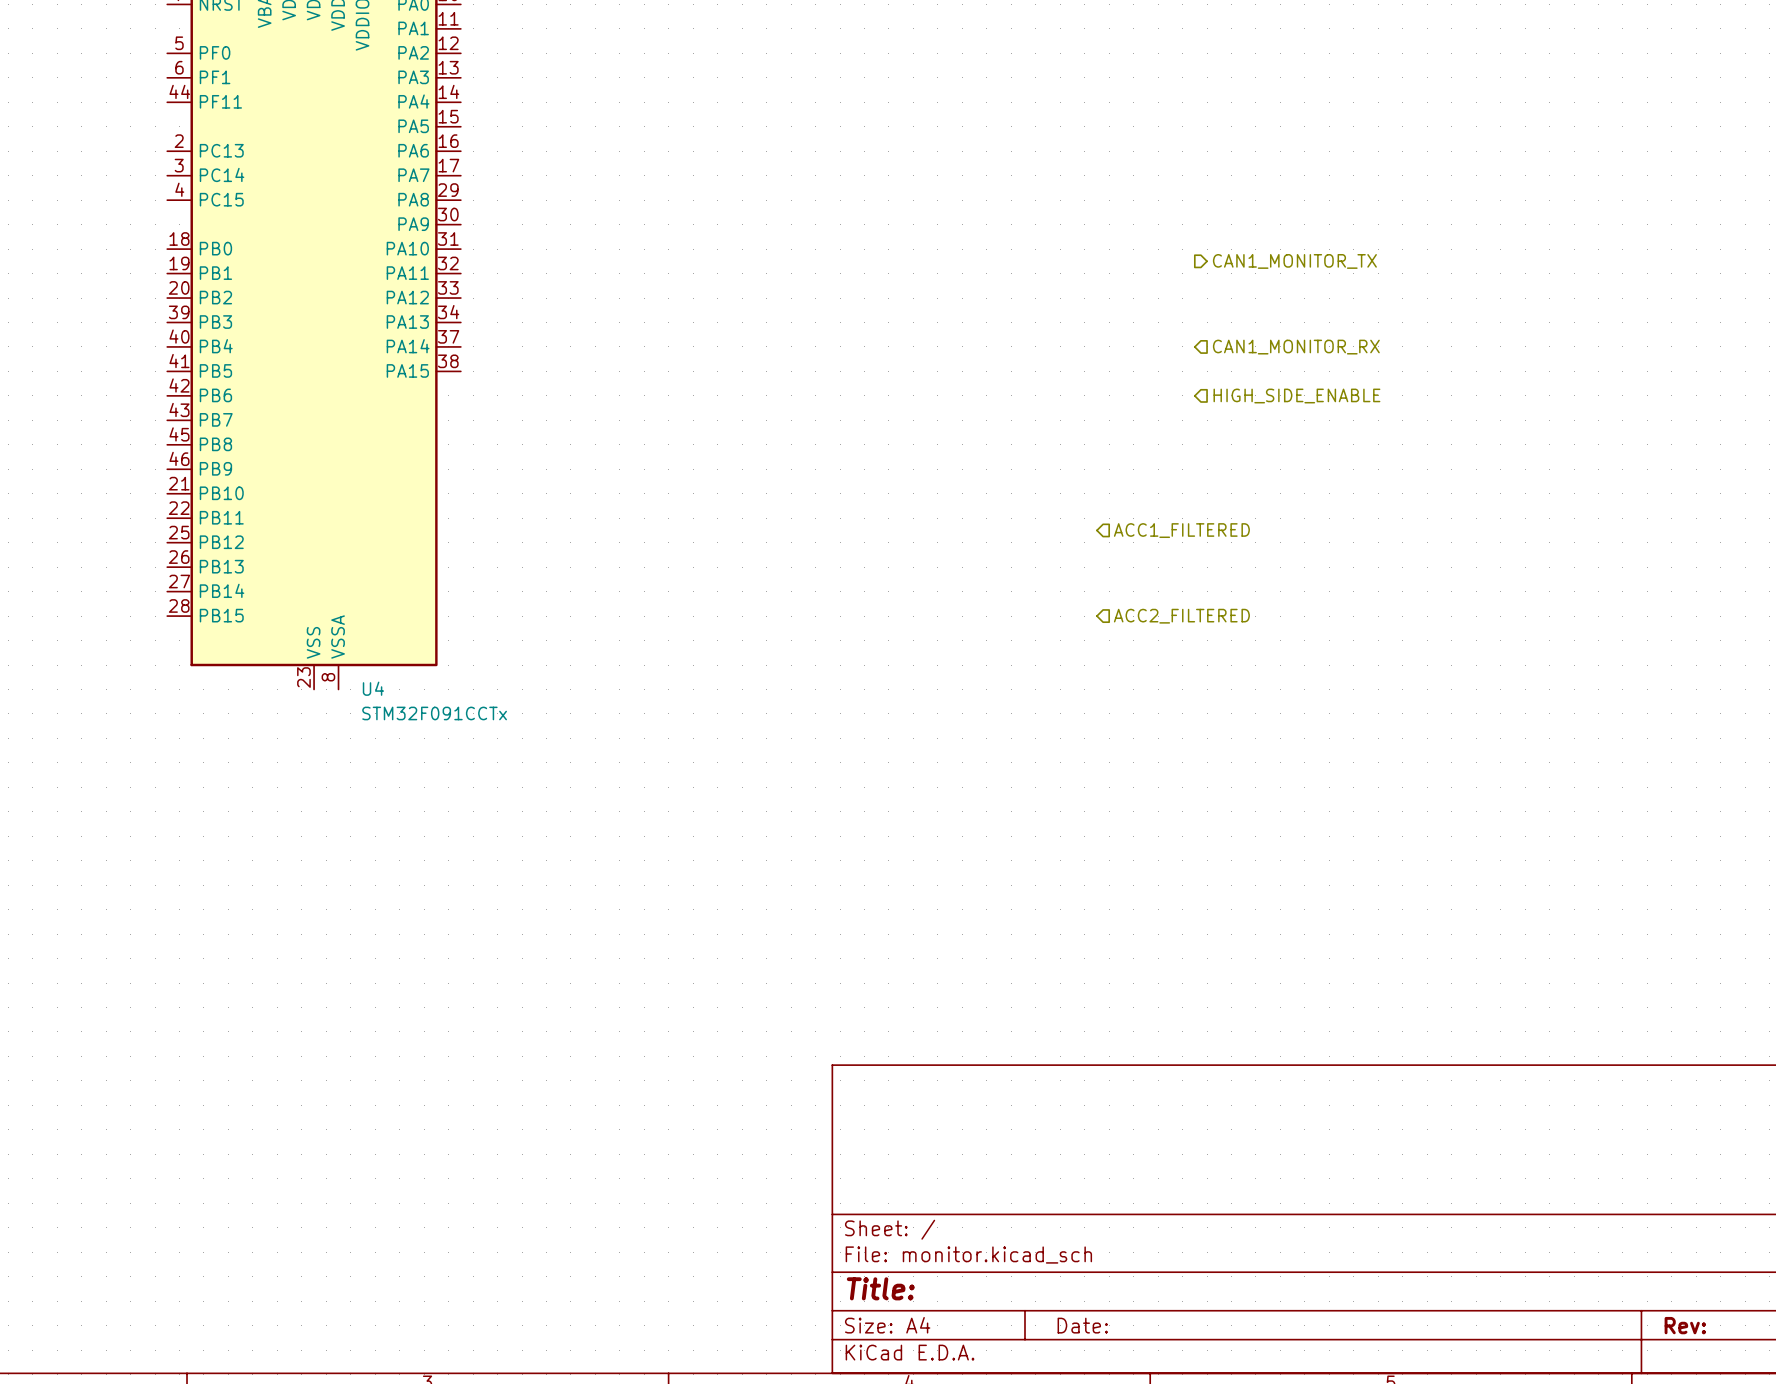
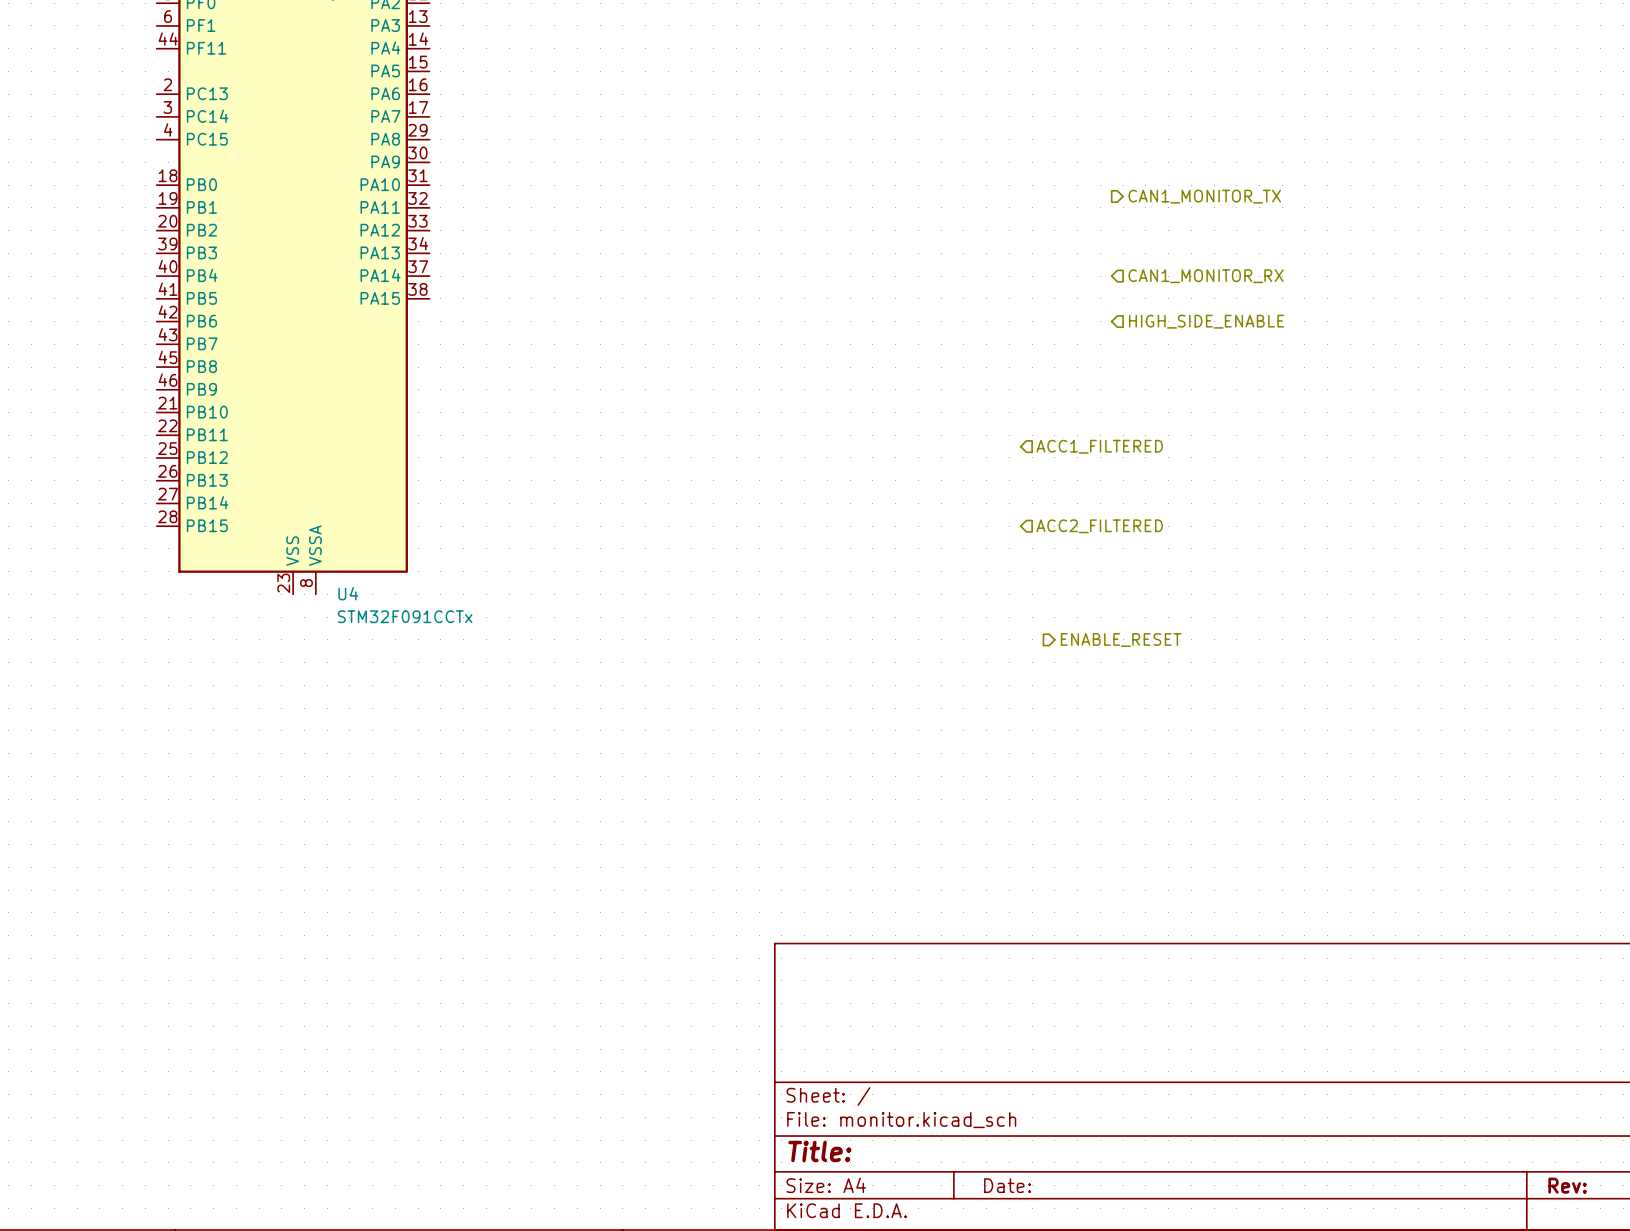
hierarchical label: none -> ENABLE_RESET (1121, 640)

